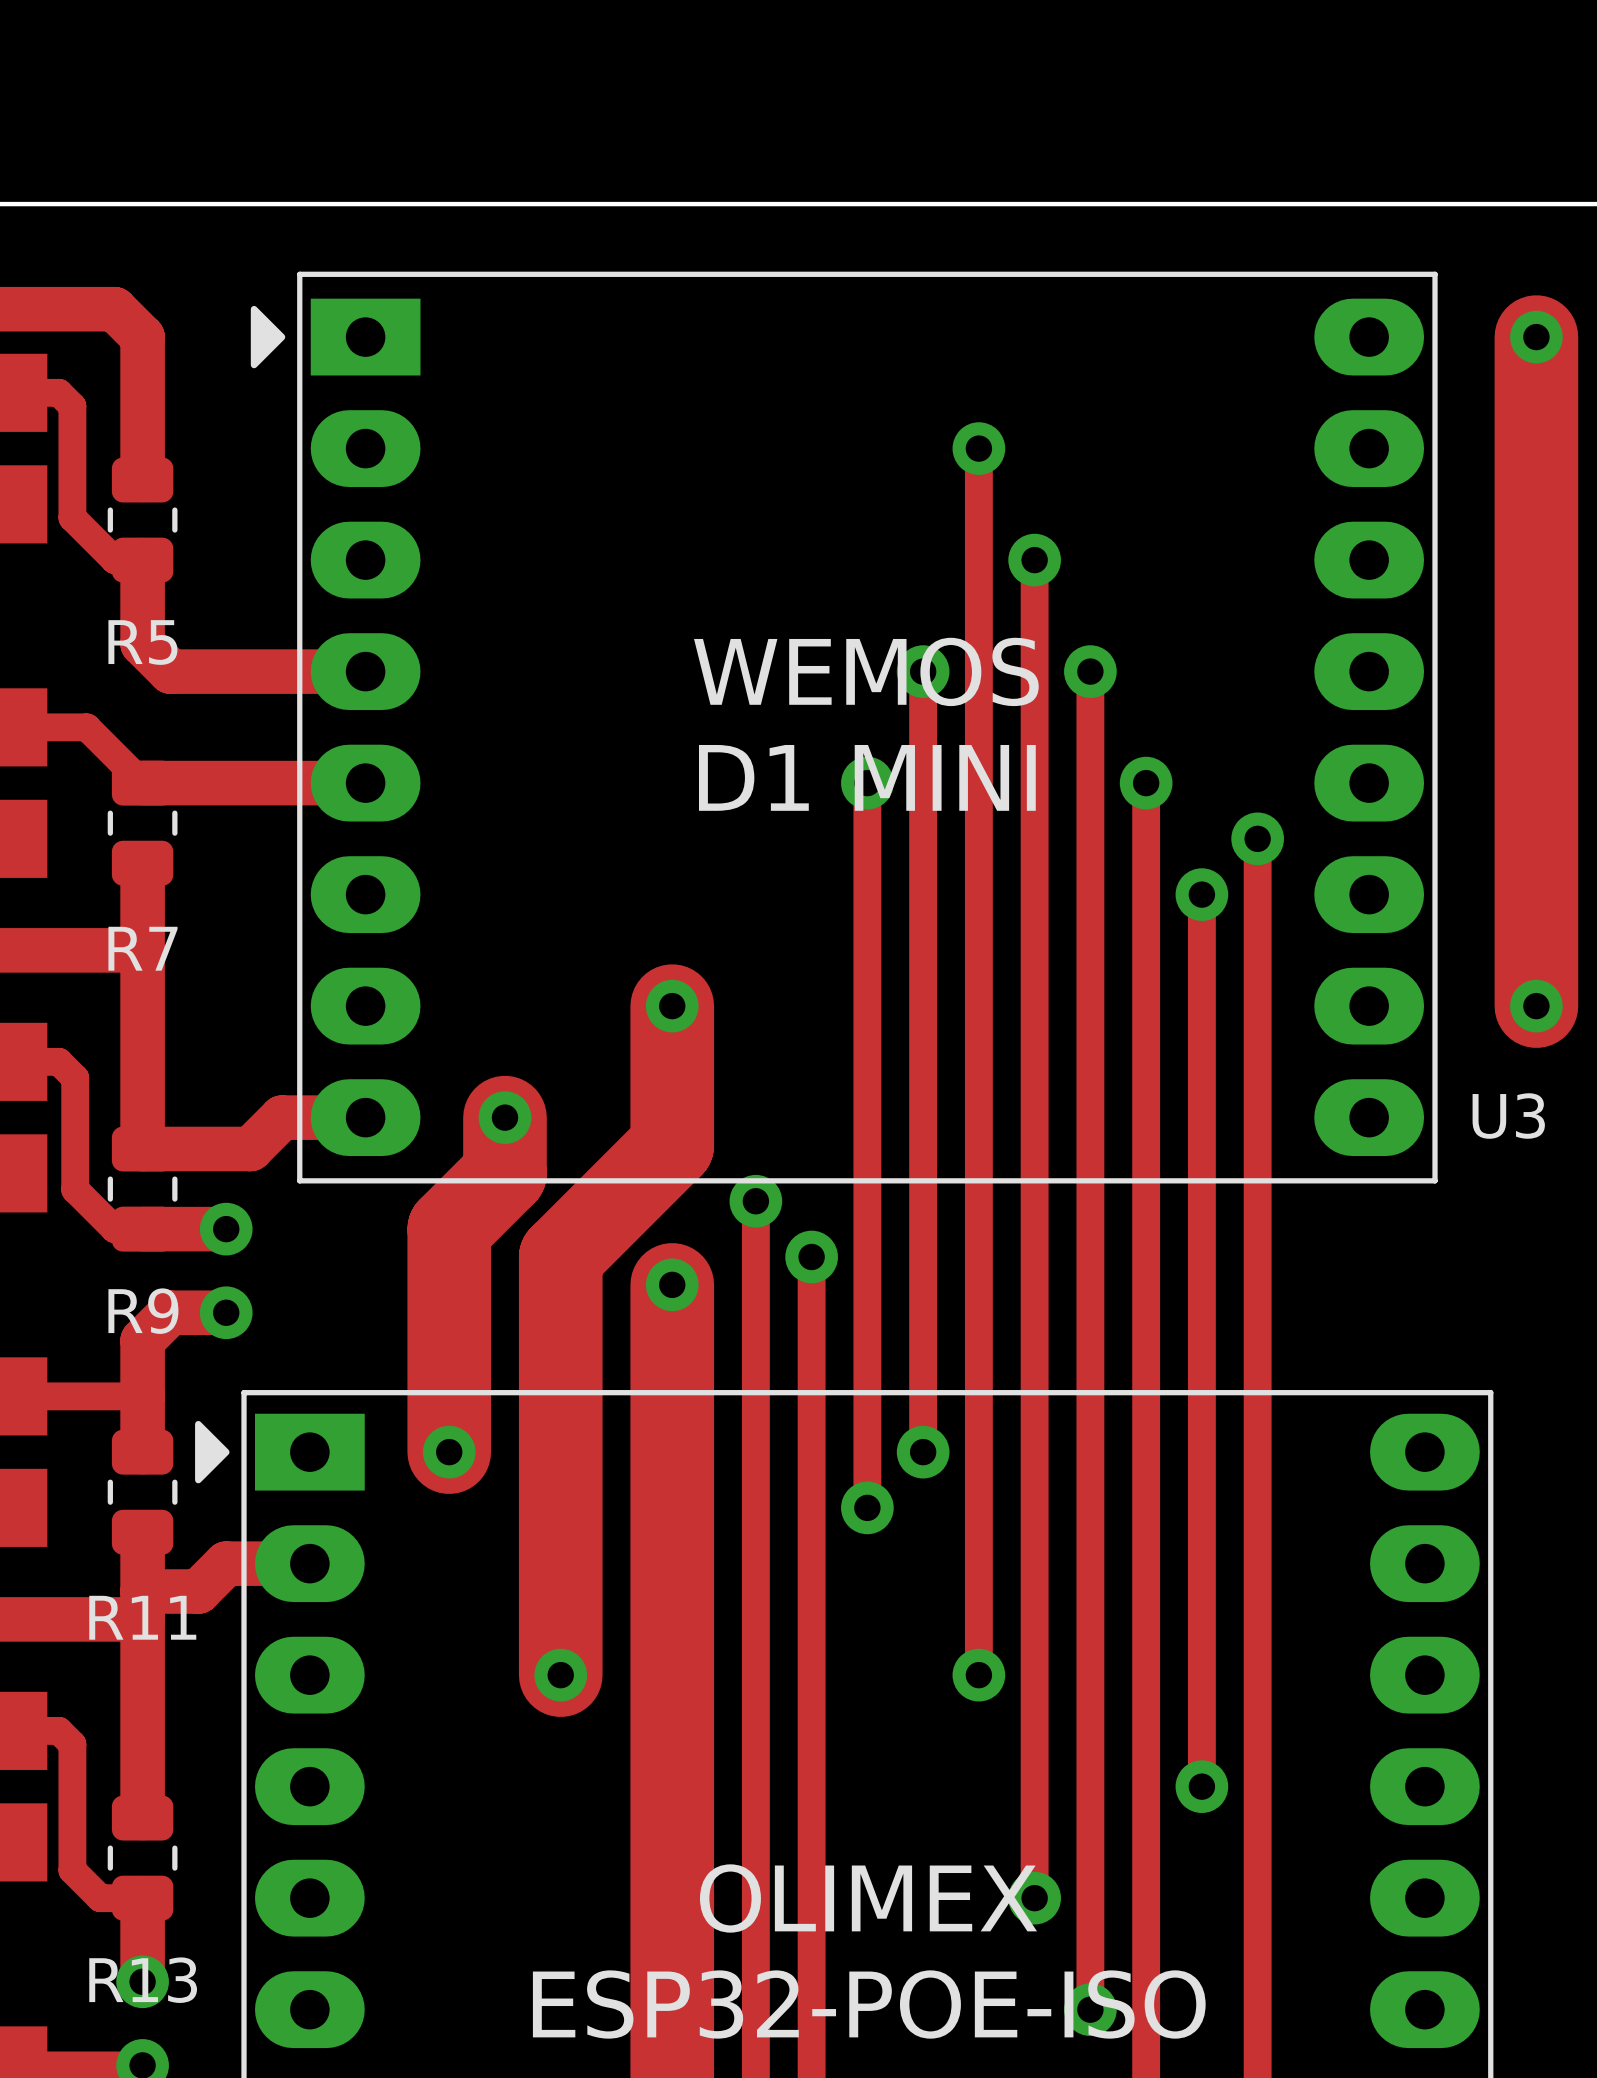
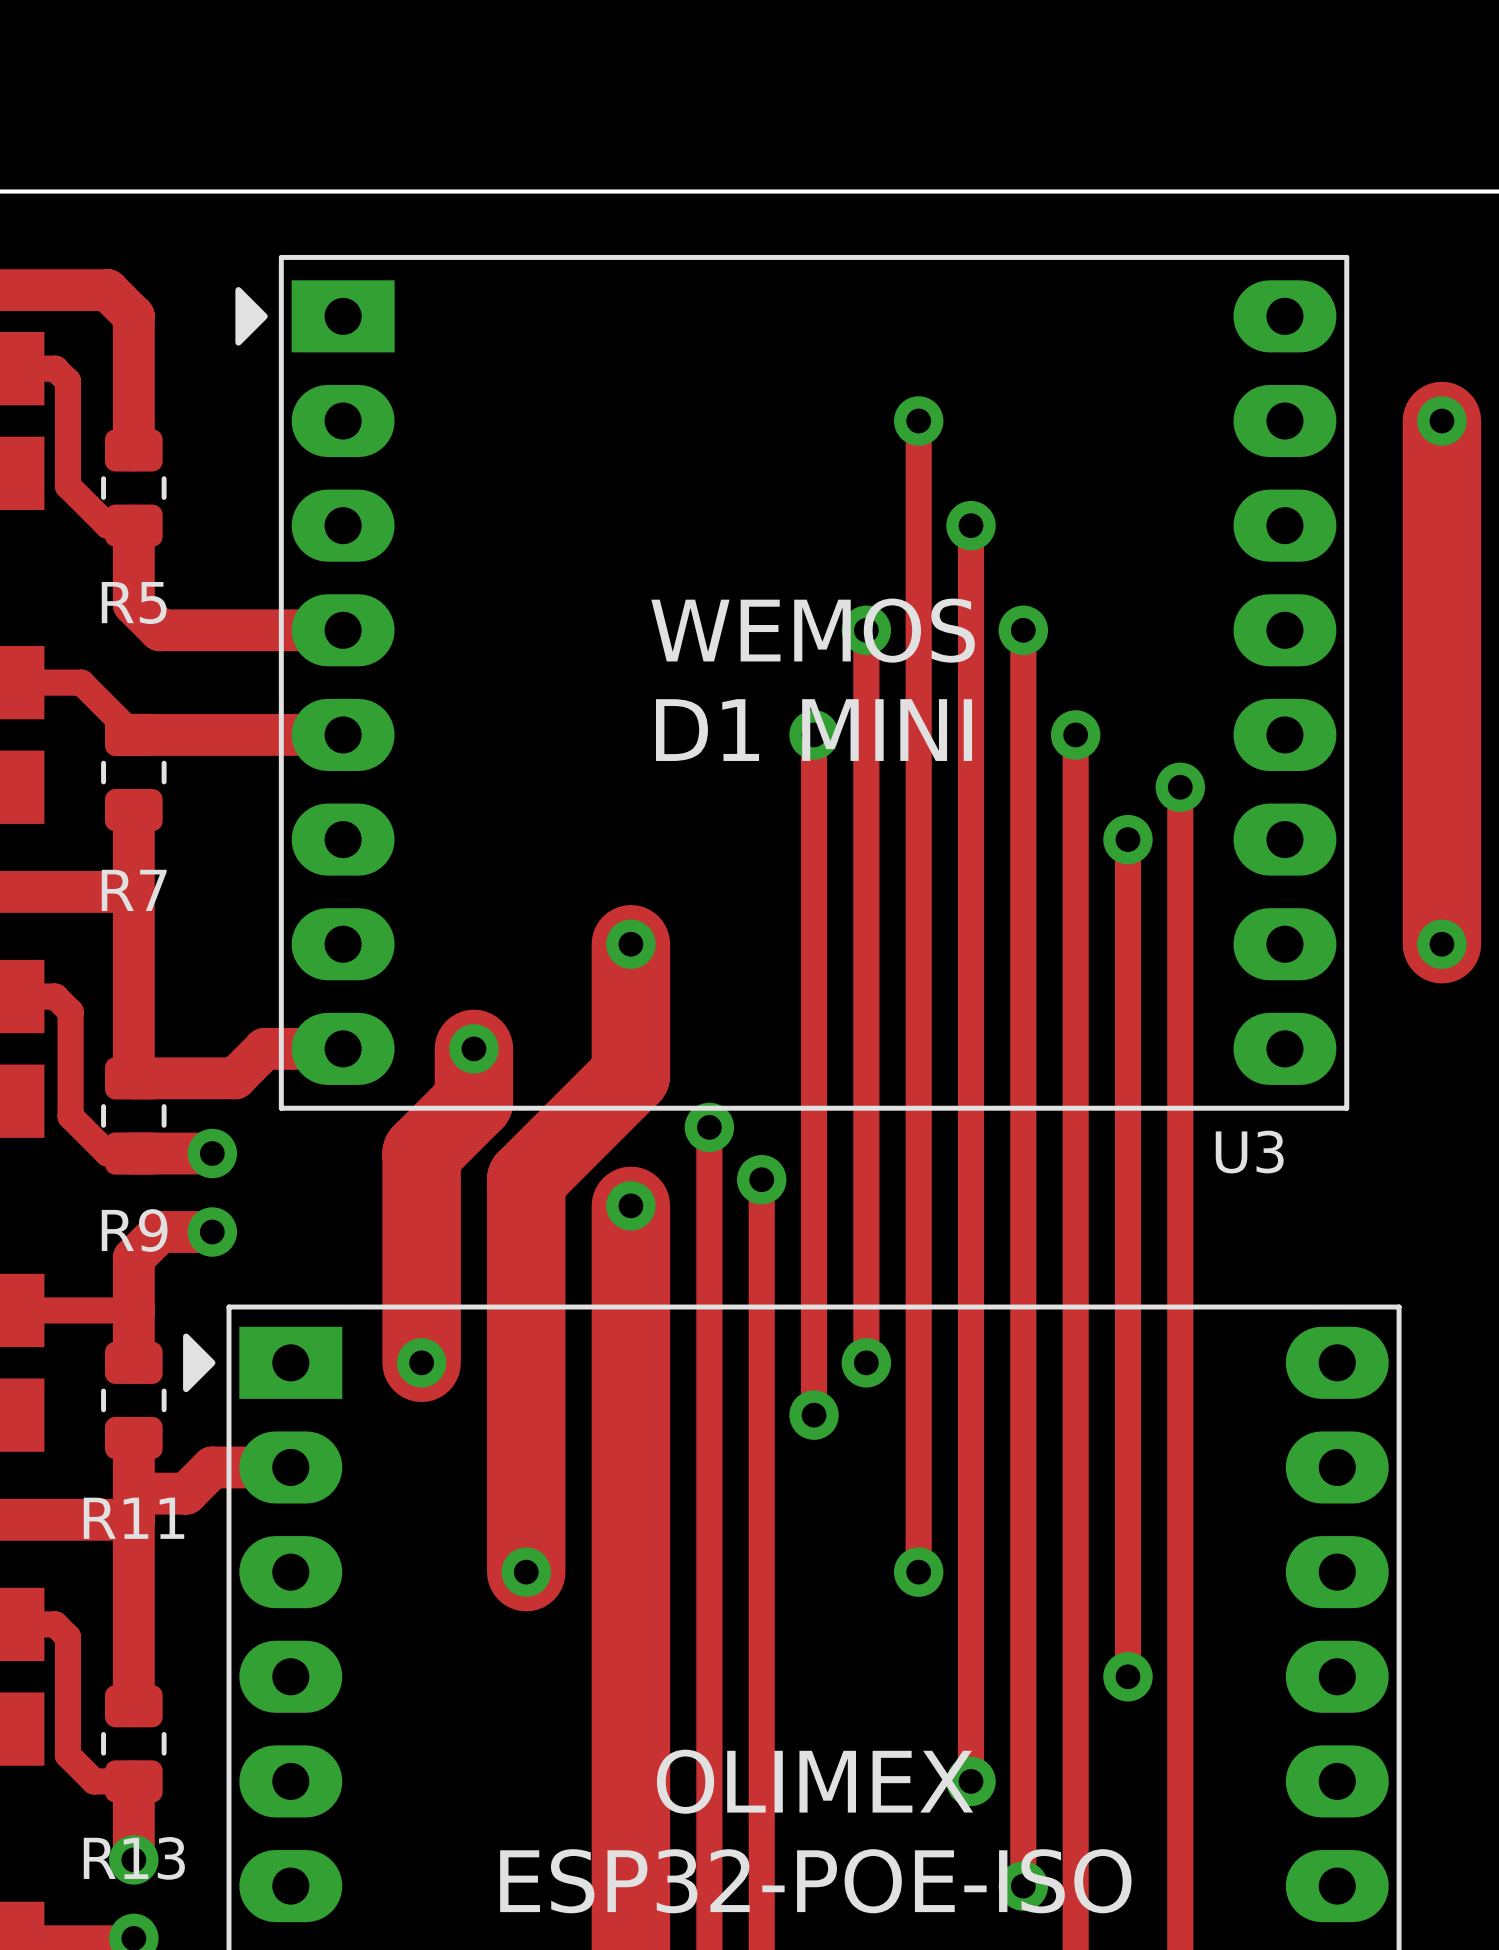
track: (1536, 337) (1536, 448) -> none
via position: (1536, 337) -> (1441, 421)
U3 name position: U3 (1508, 1116) -> U3 (1249, 1152)

